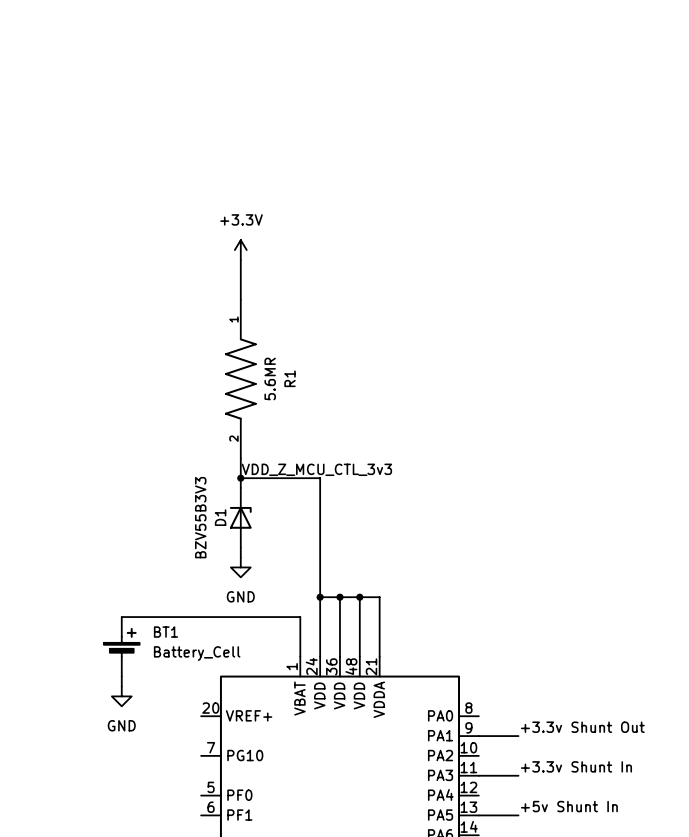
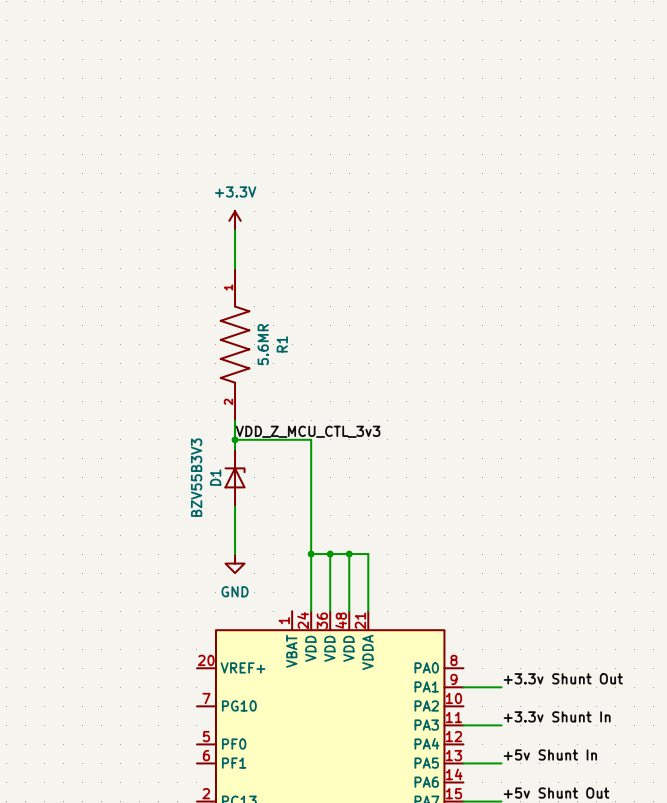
wire: none -> (235, 515) (235, 554)
power symbol position: GND (240, 567) -> GND (235, 563)
wire: (121, 617) (300, 617) (300, 656) -> none
BT1: Battery_Cell (121, 646) -> none
wire: (121, 676) (121, 686) -> none
power symbol: GND (121, 696) -> none

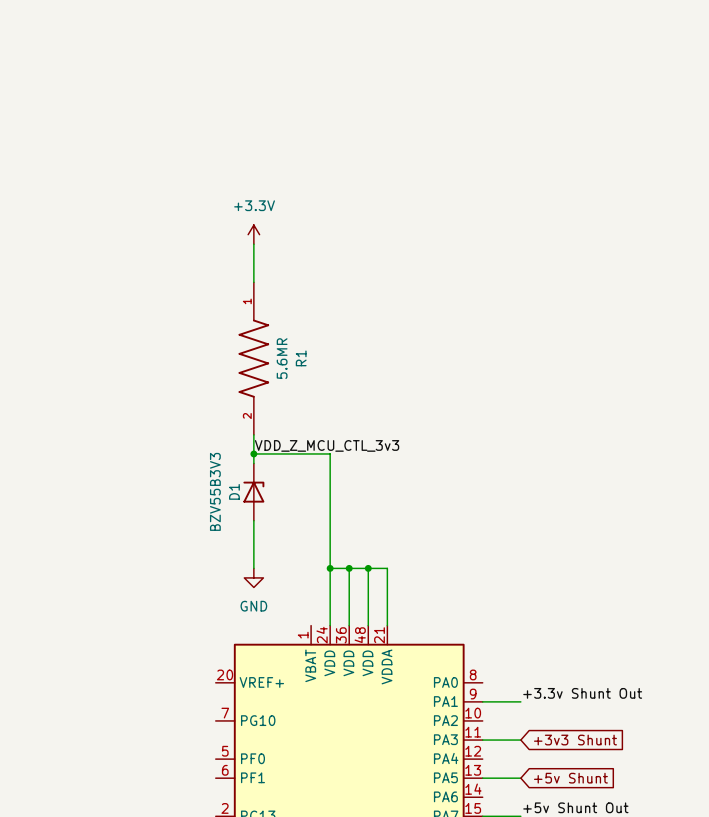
label: +3.3v Shunt In (557, 716) -> none
global label: none -> +3v3 Shunt (575, 740)
label: +5v Shunt In (550, 754) -> none
global label: none -> +5v Shunt (570, 778)

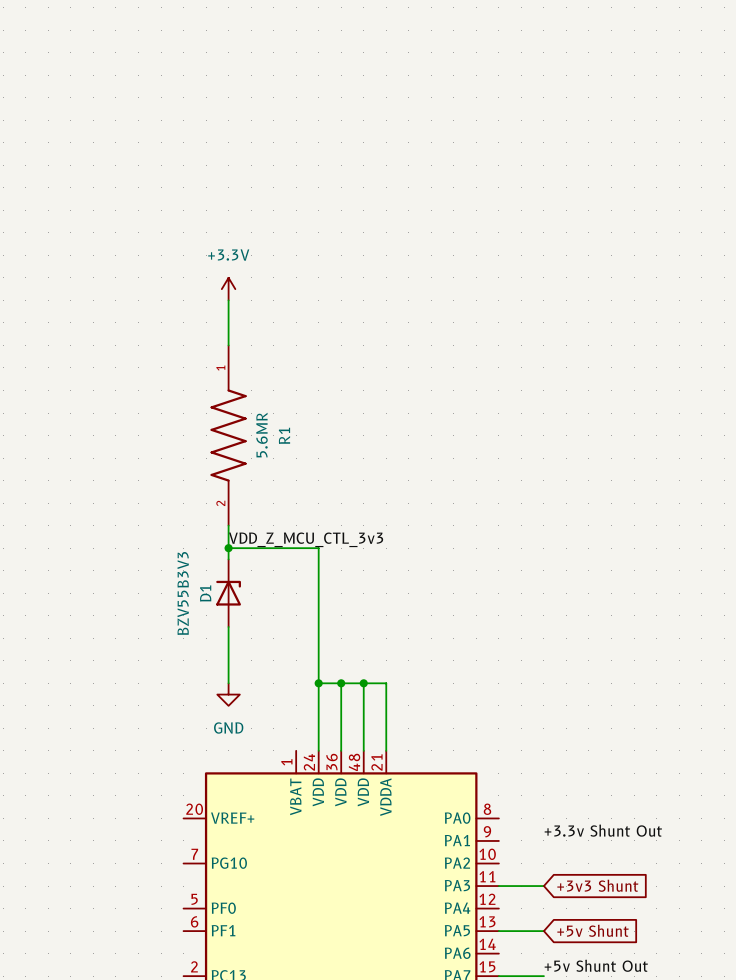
wire: (482, 701) (520, 701) -> none

